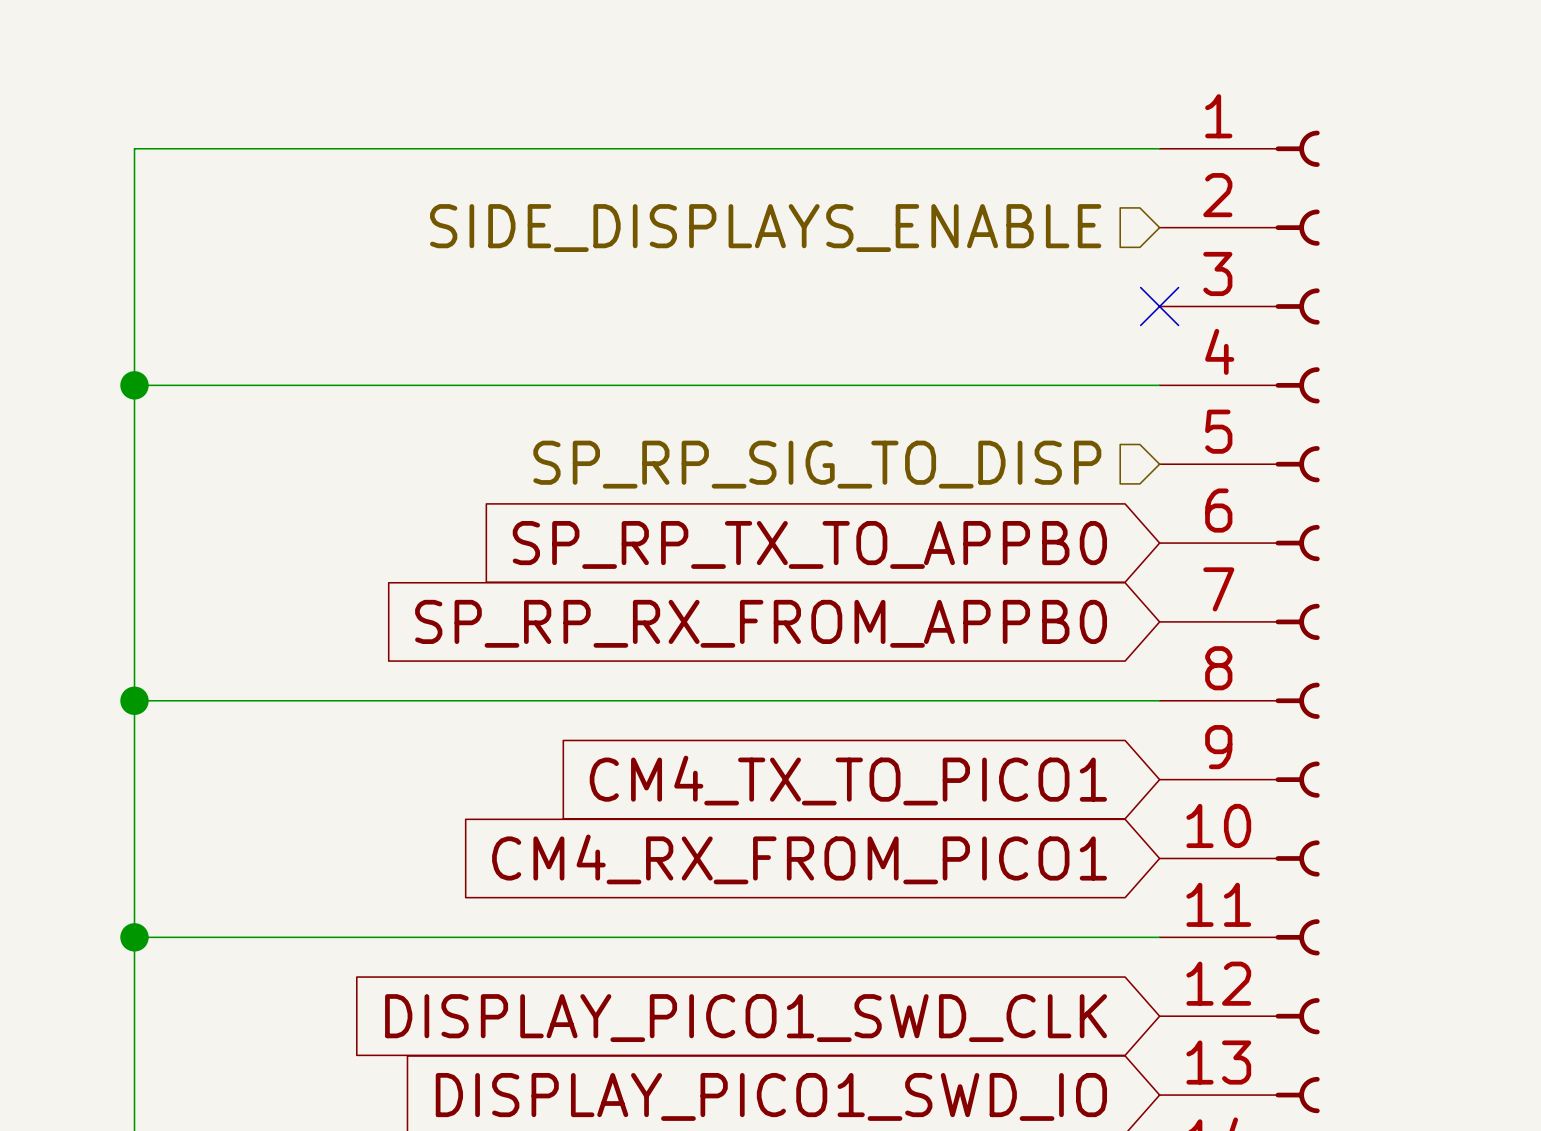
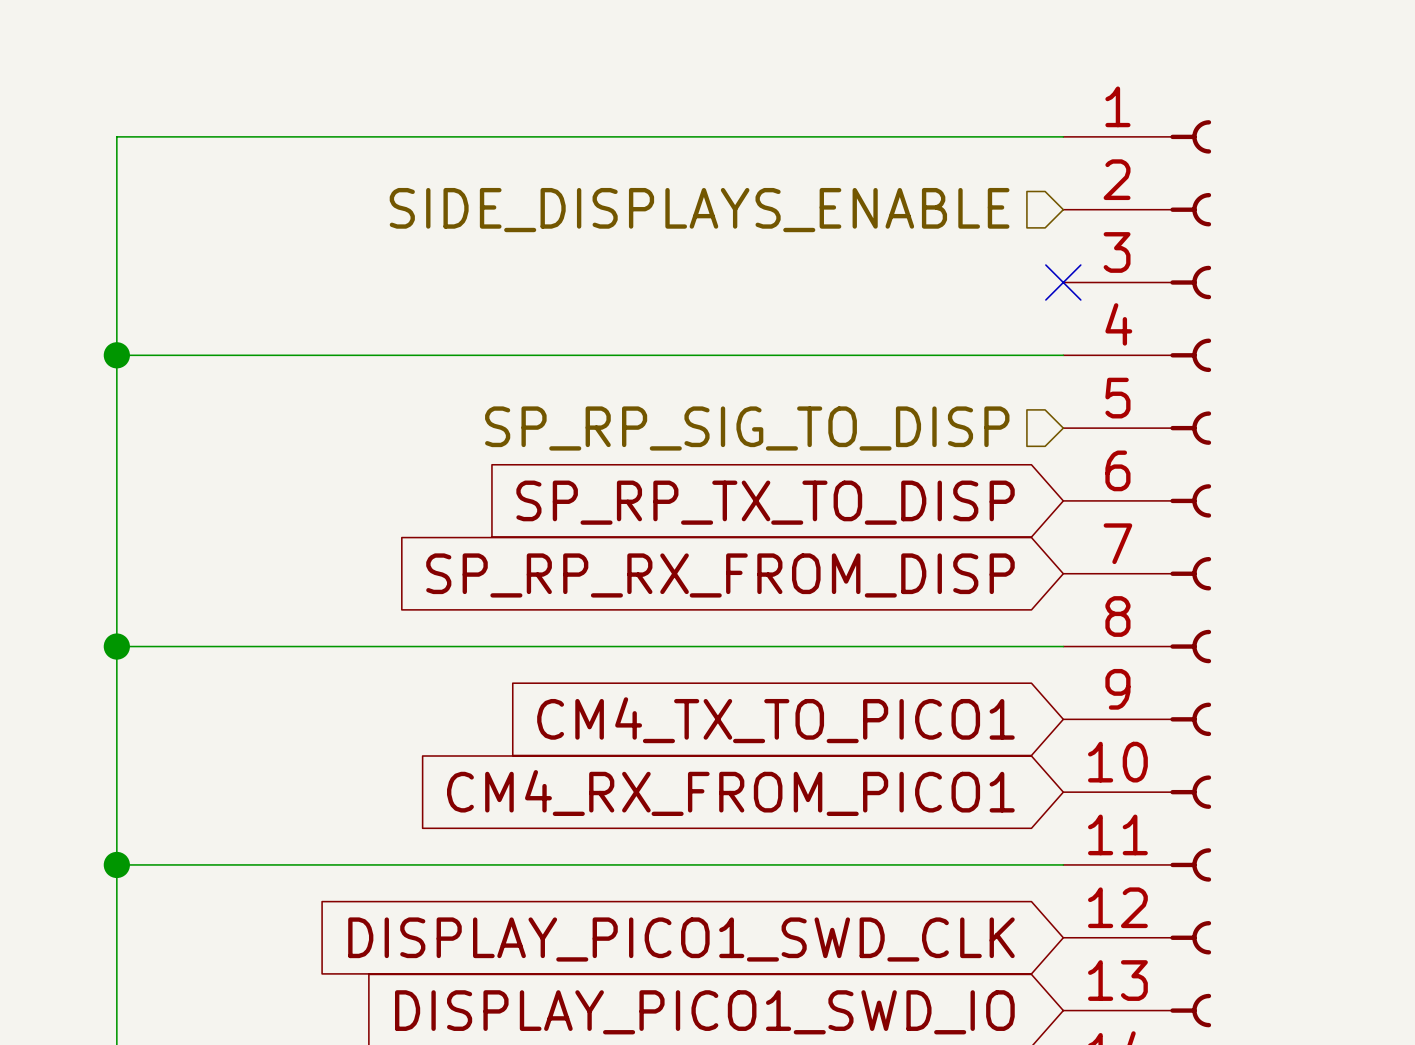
global label: SP_RP_TX_TO_APPB0 (809, 544) -> SP_RP_TX_TO_DISP (765, 502)
global label: SP_RP_RX_FROM_APPB0 (761, 623) -> SP_RP_RX_FROM_DISP (720, 575)

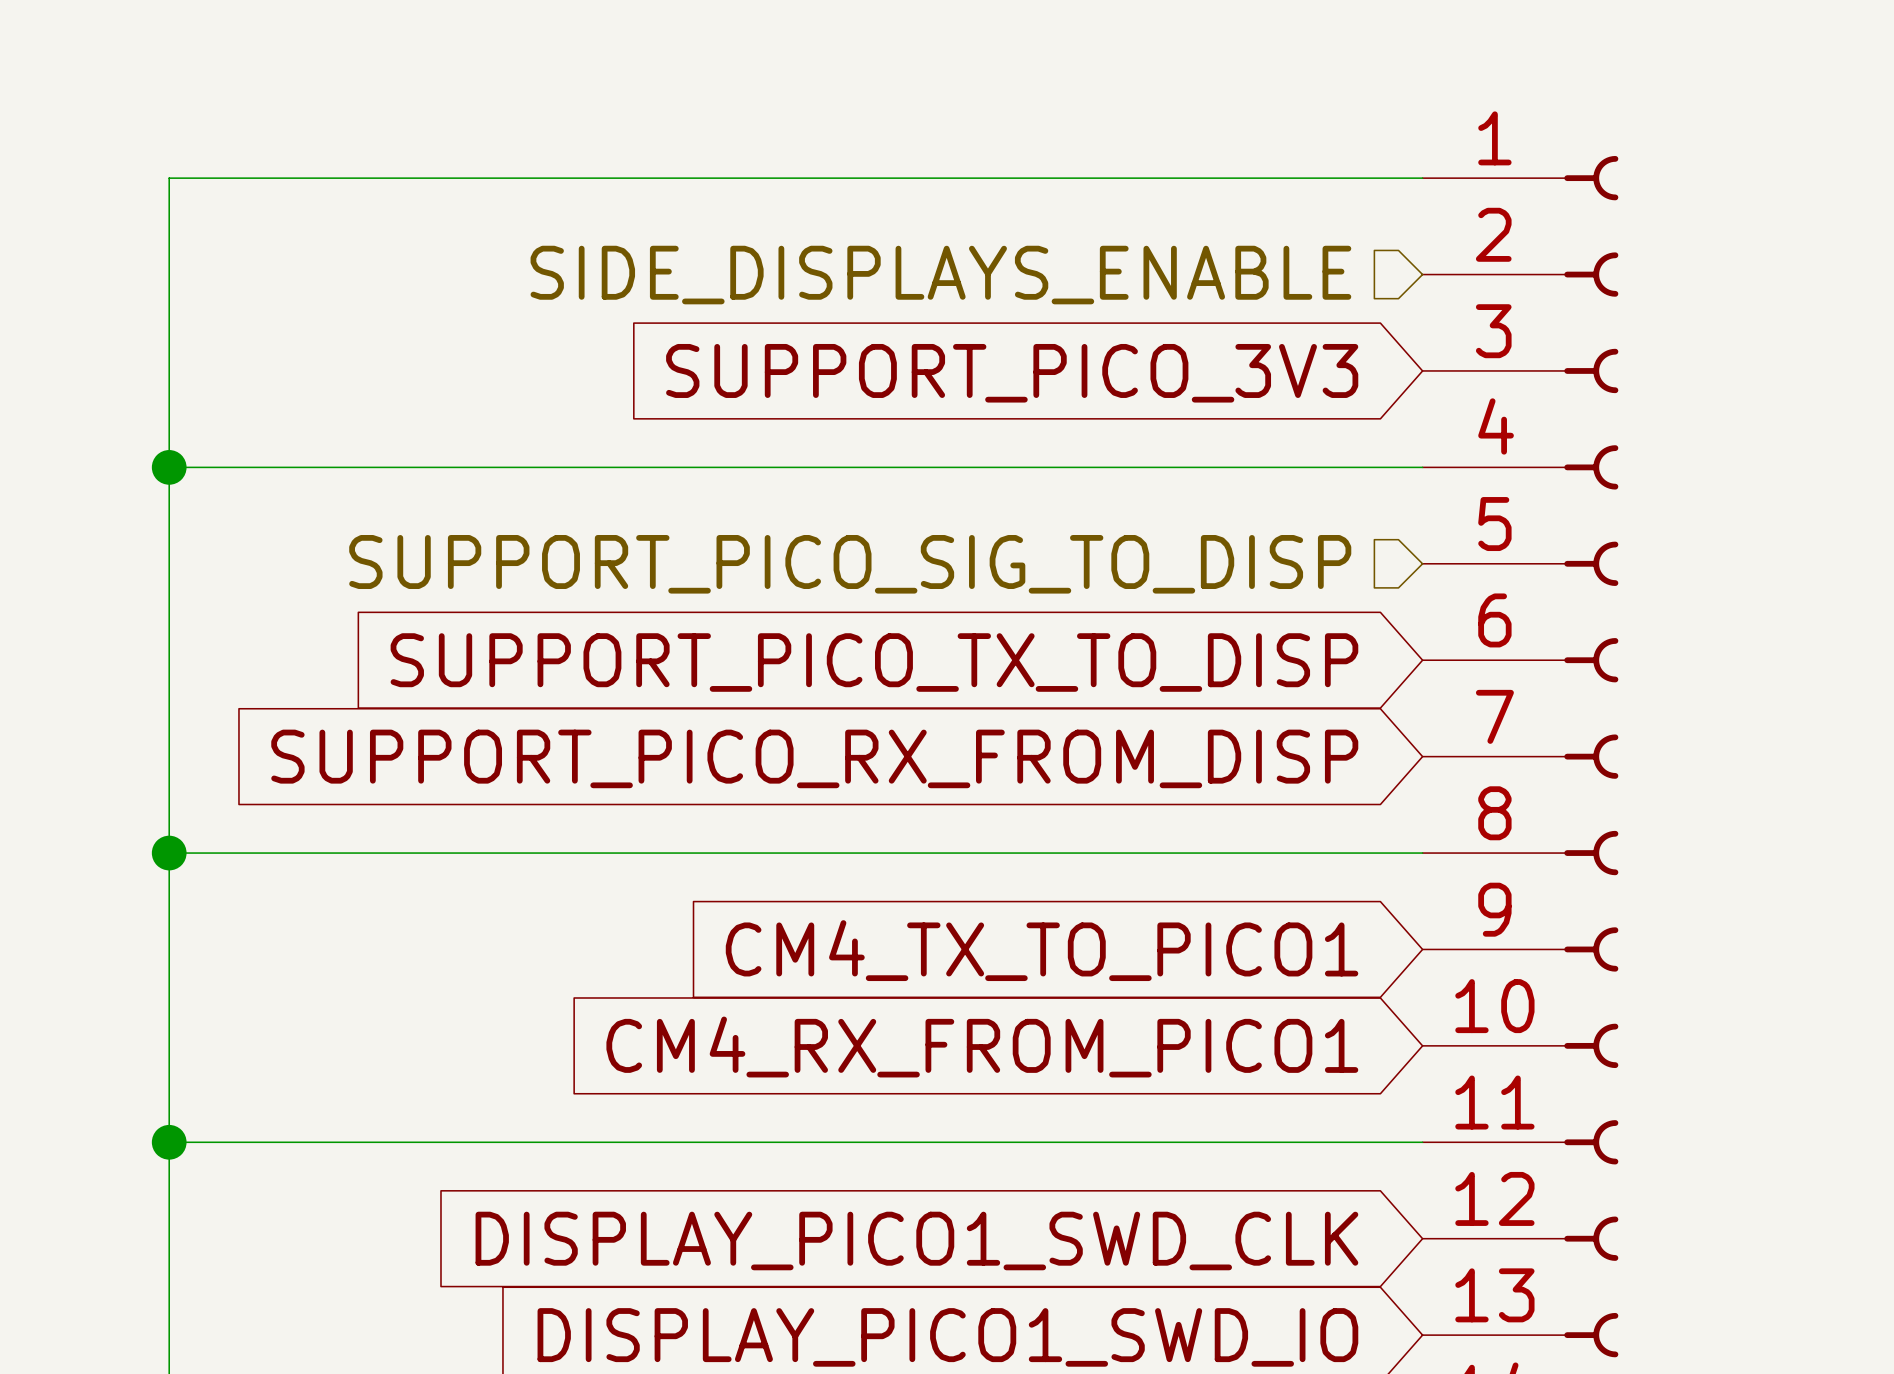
no-connect mark: (1063, 282) -> none
global label: none -> SUPPORT_PICO_3V3 (1012, 373)
hierarchical label: SP_RP_SIG_TO_DISP (747, 428) -> SUPPORT_PICO_SIG_TO_DISP (850, 564)
global label: SP_RP_TX_TO_DISP (765, 502) -> SUPPORT_PICO_TX_TO_DISP (874, 662)
global label: SP_RP_RX_FROM_DISP (720, 575) -> SUPPORT_PICO_RX_FROM_DISP (814, 758)

